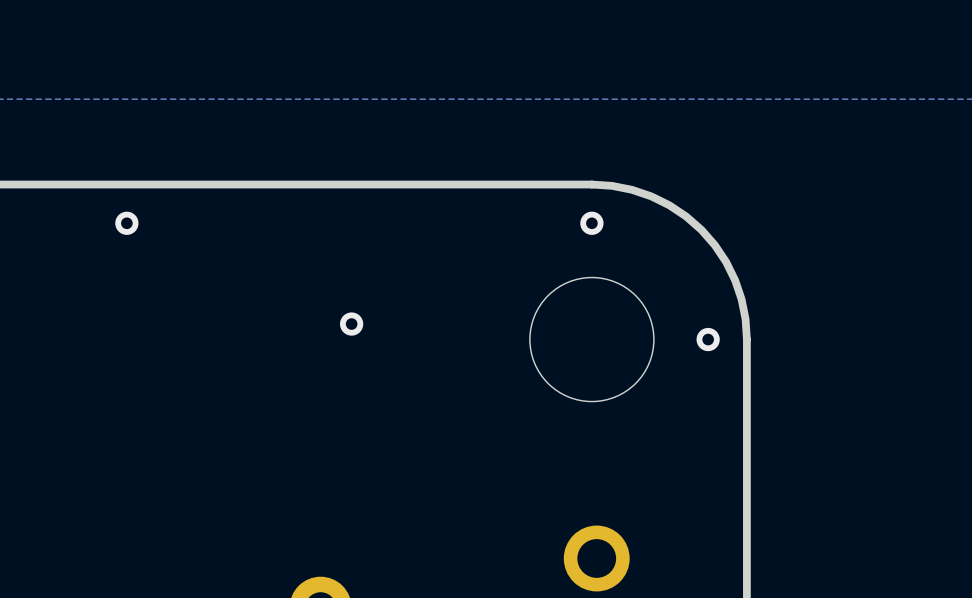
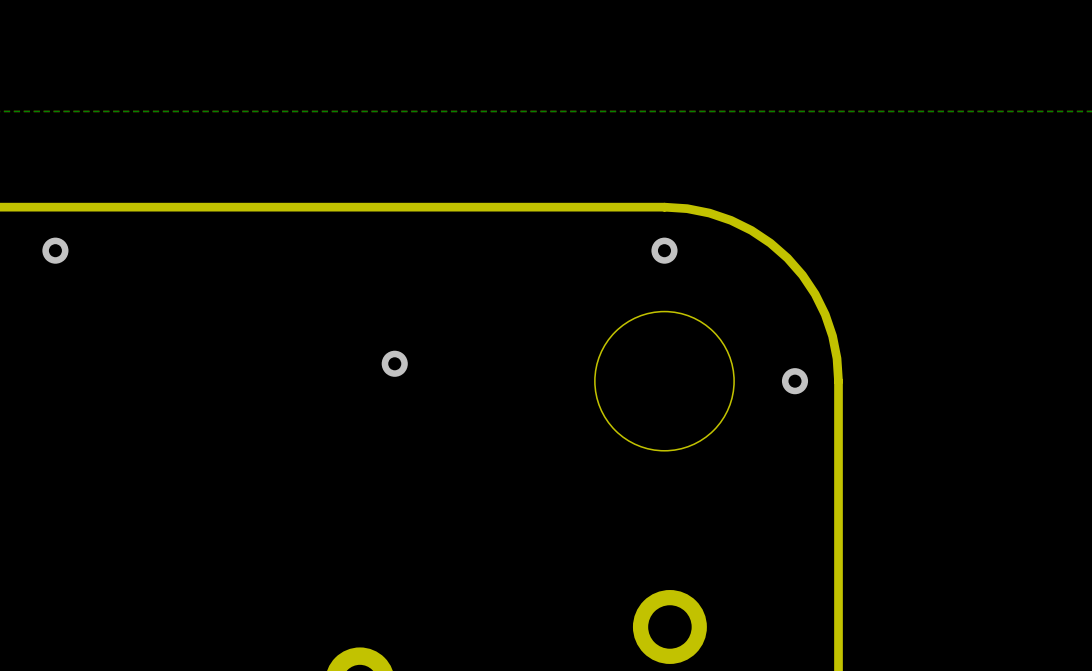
via position: (126, 223) -> (55, 250)

